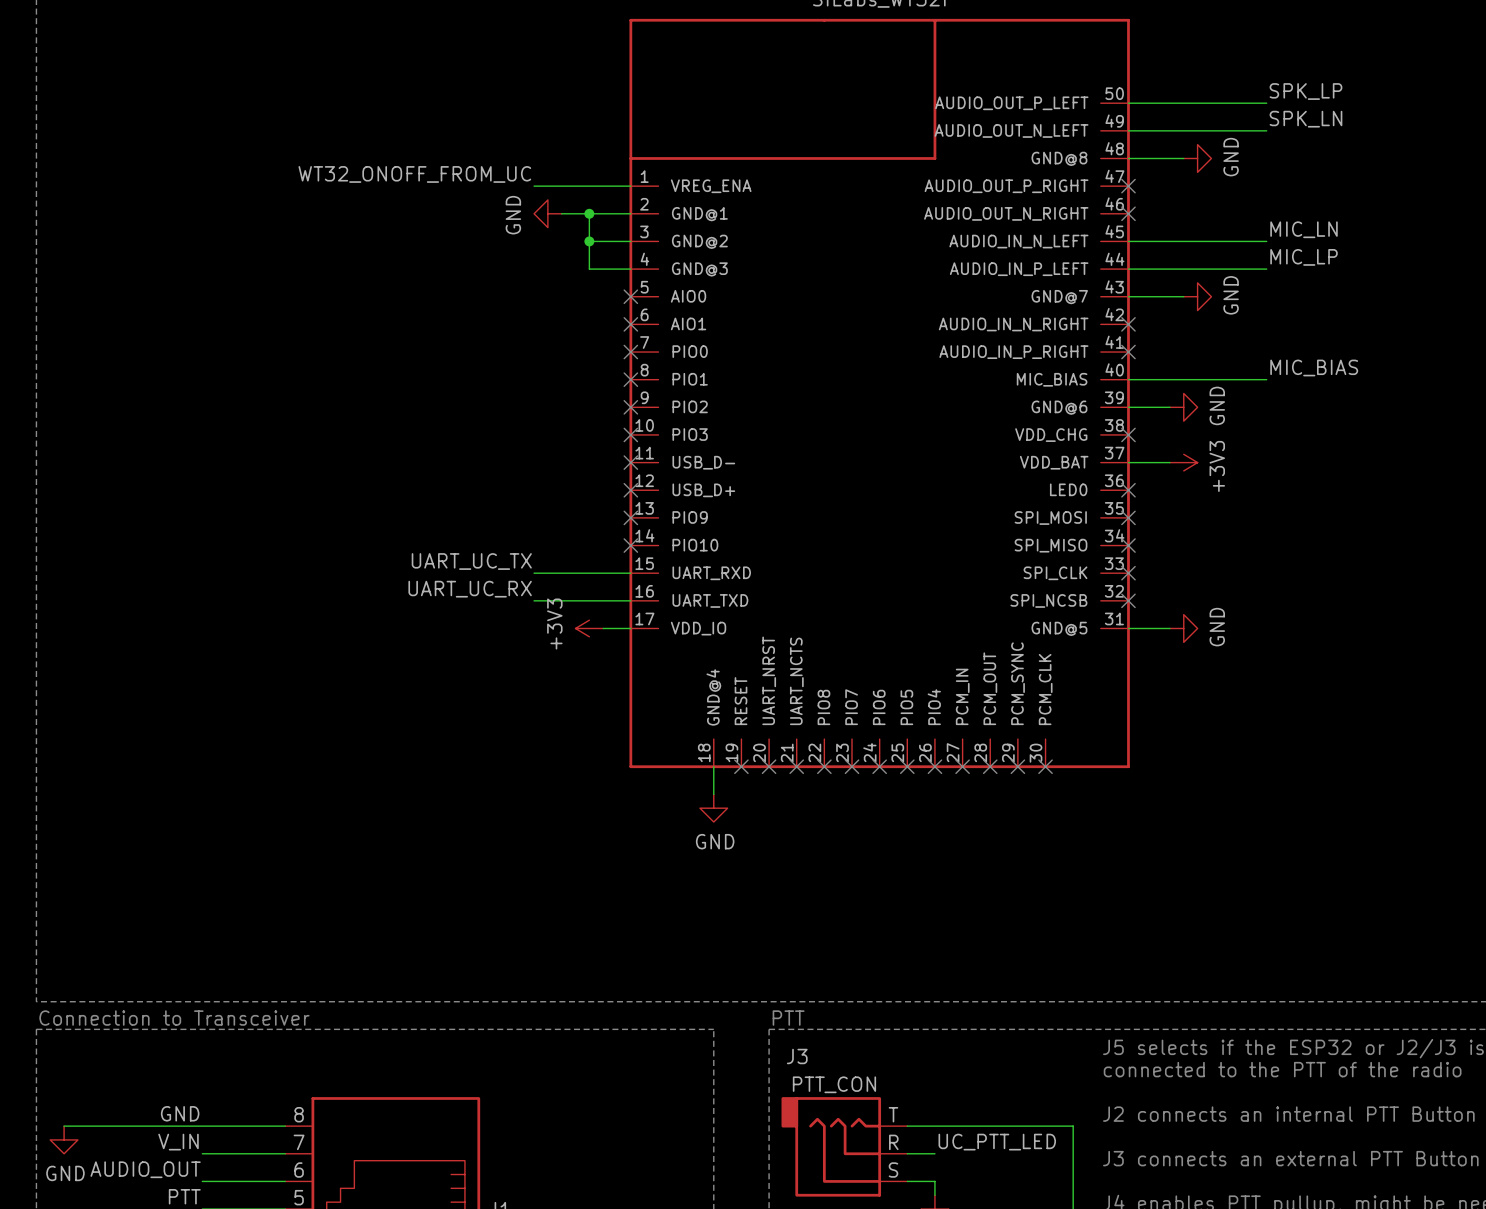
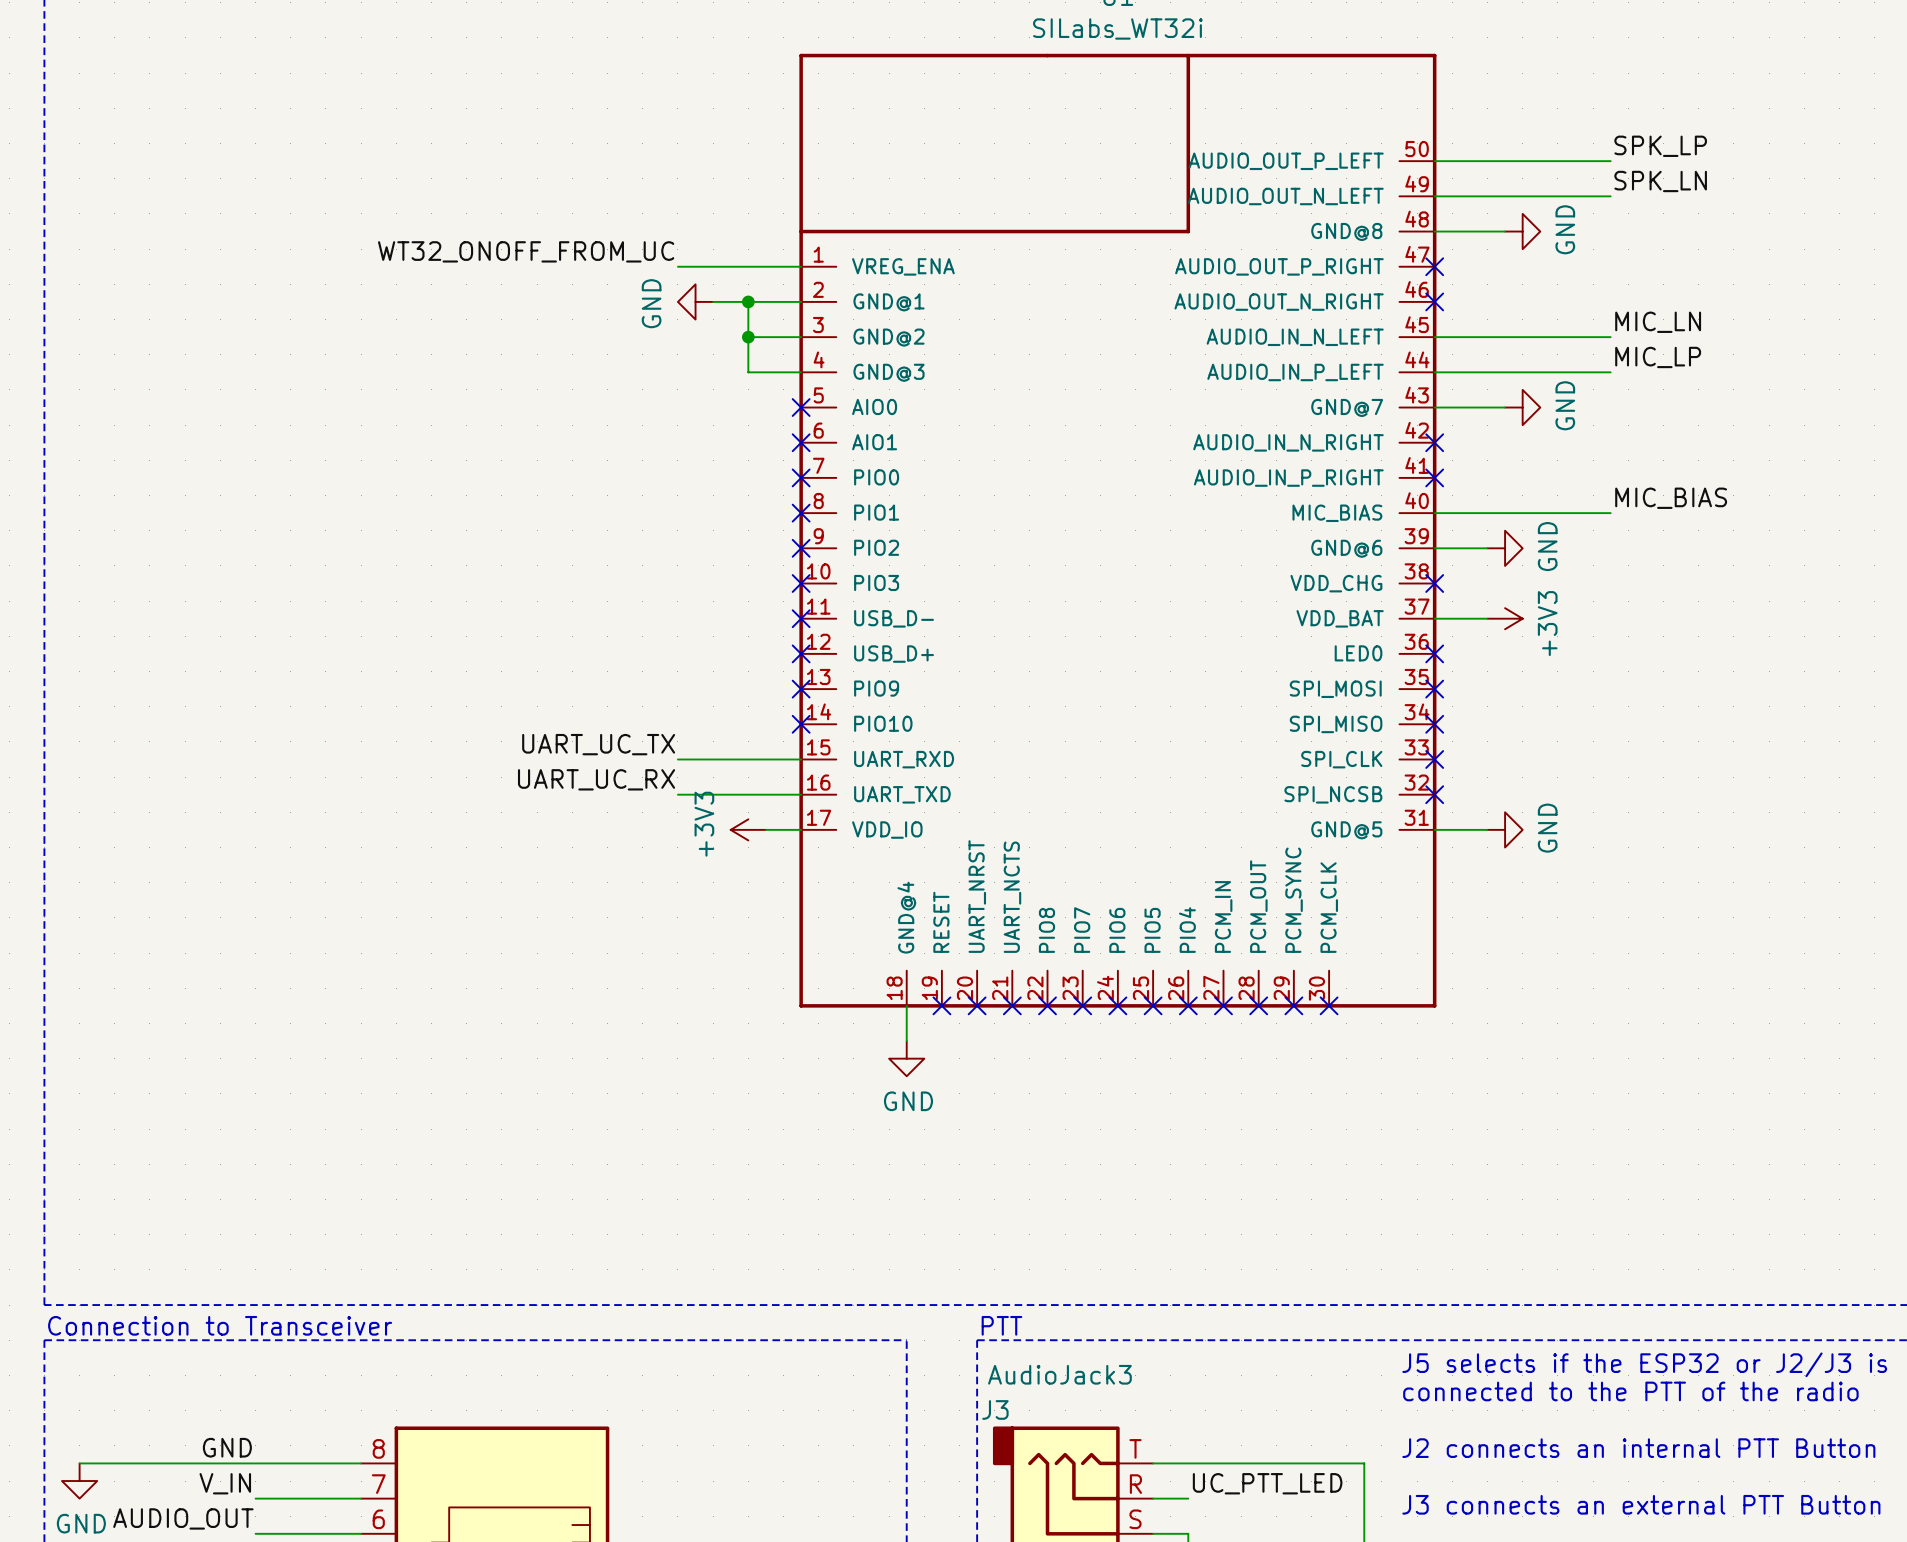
J3 name position: J3 (797, 1056) -> J3 (995, 1409)
J3 value: PTT_CON (834, 1084) -> AudioJack3 (1059, 1374)

